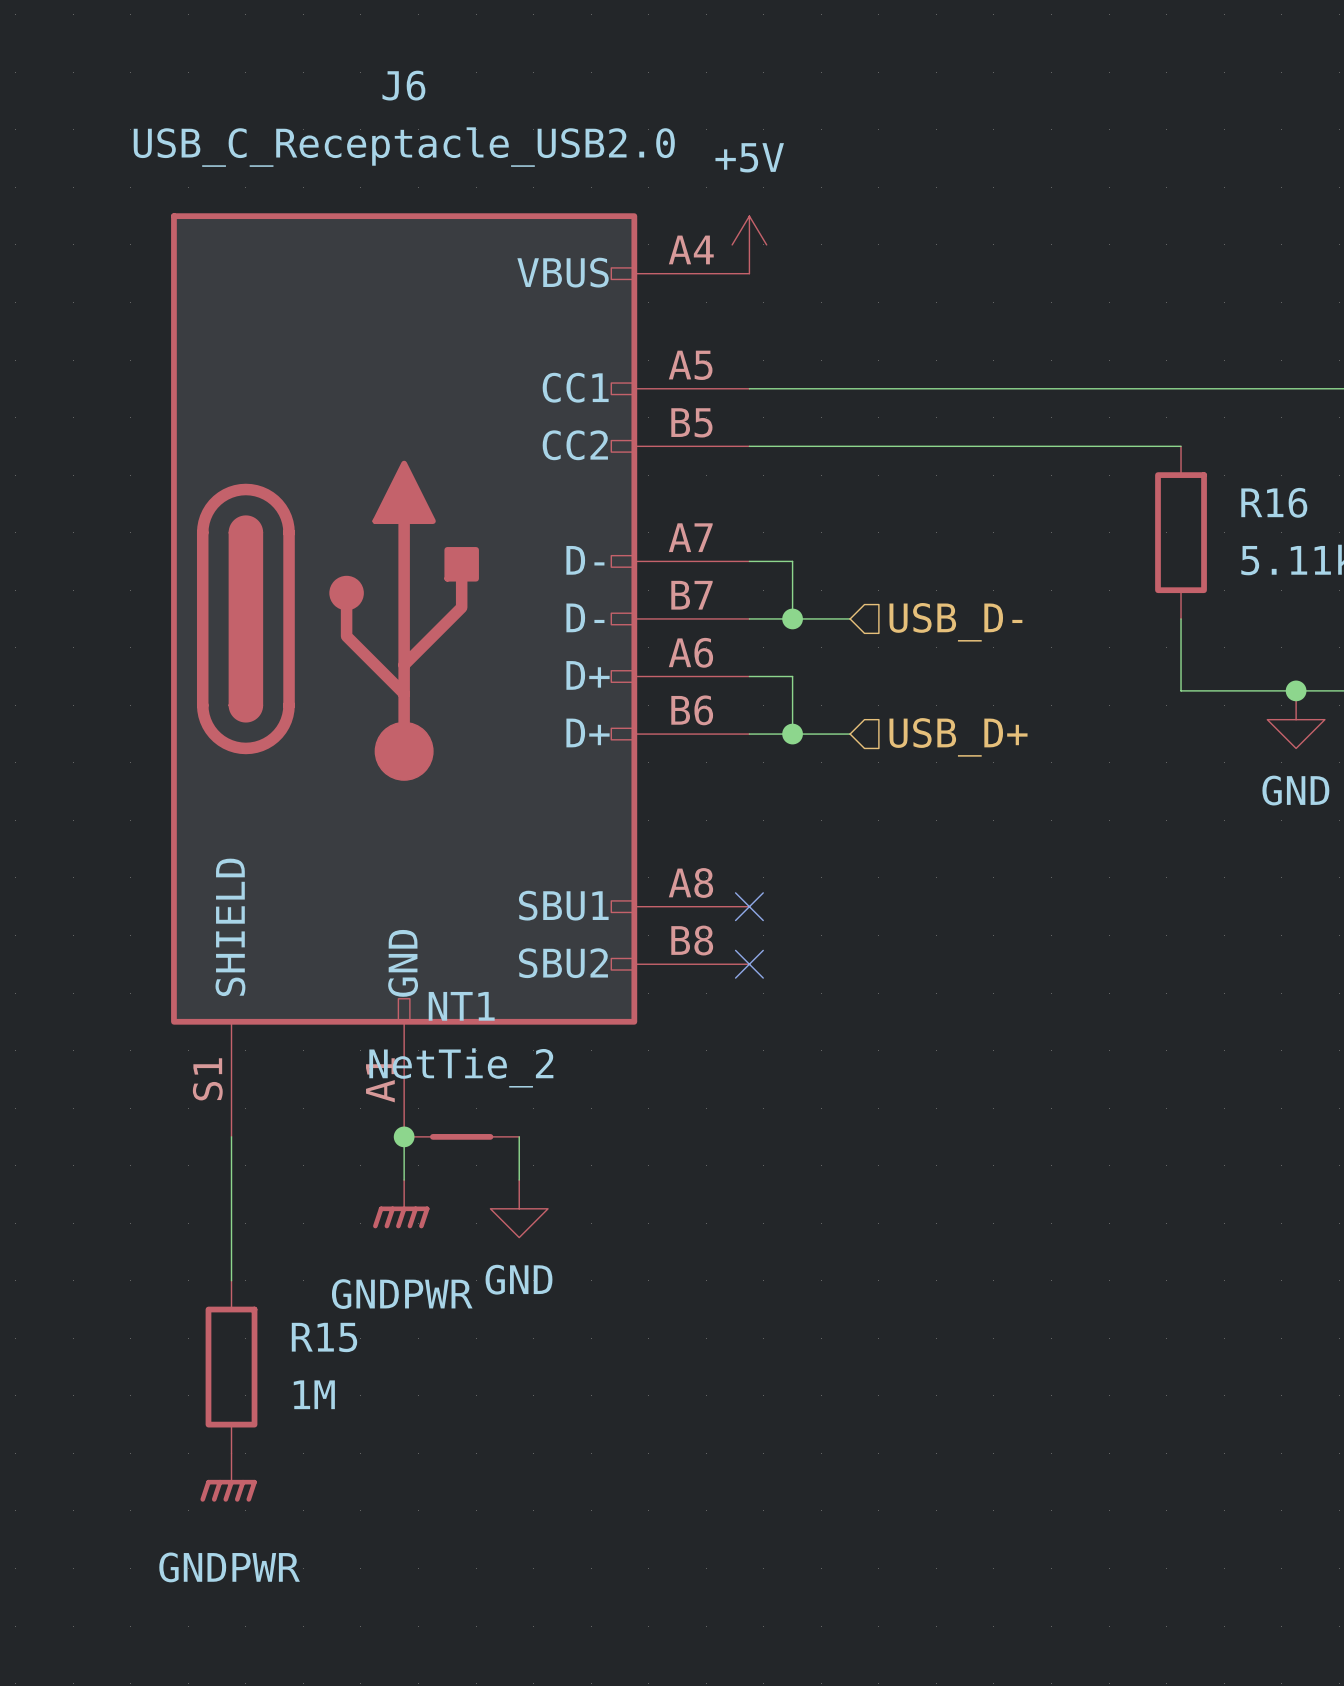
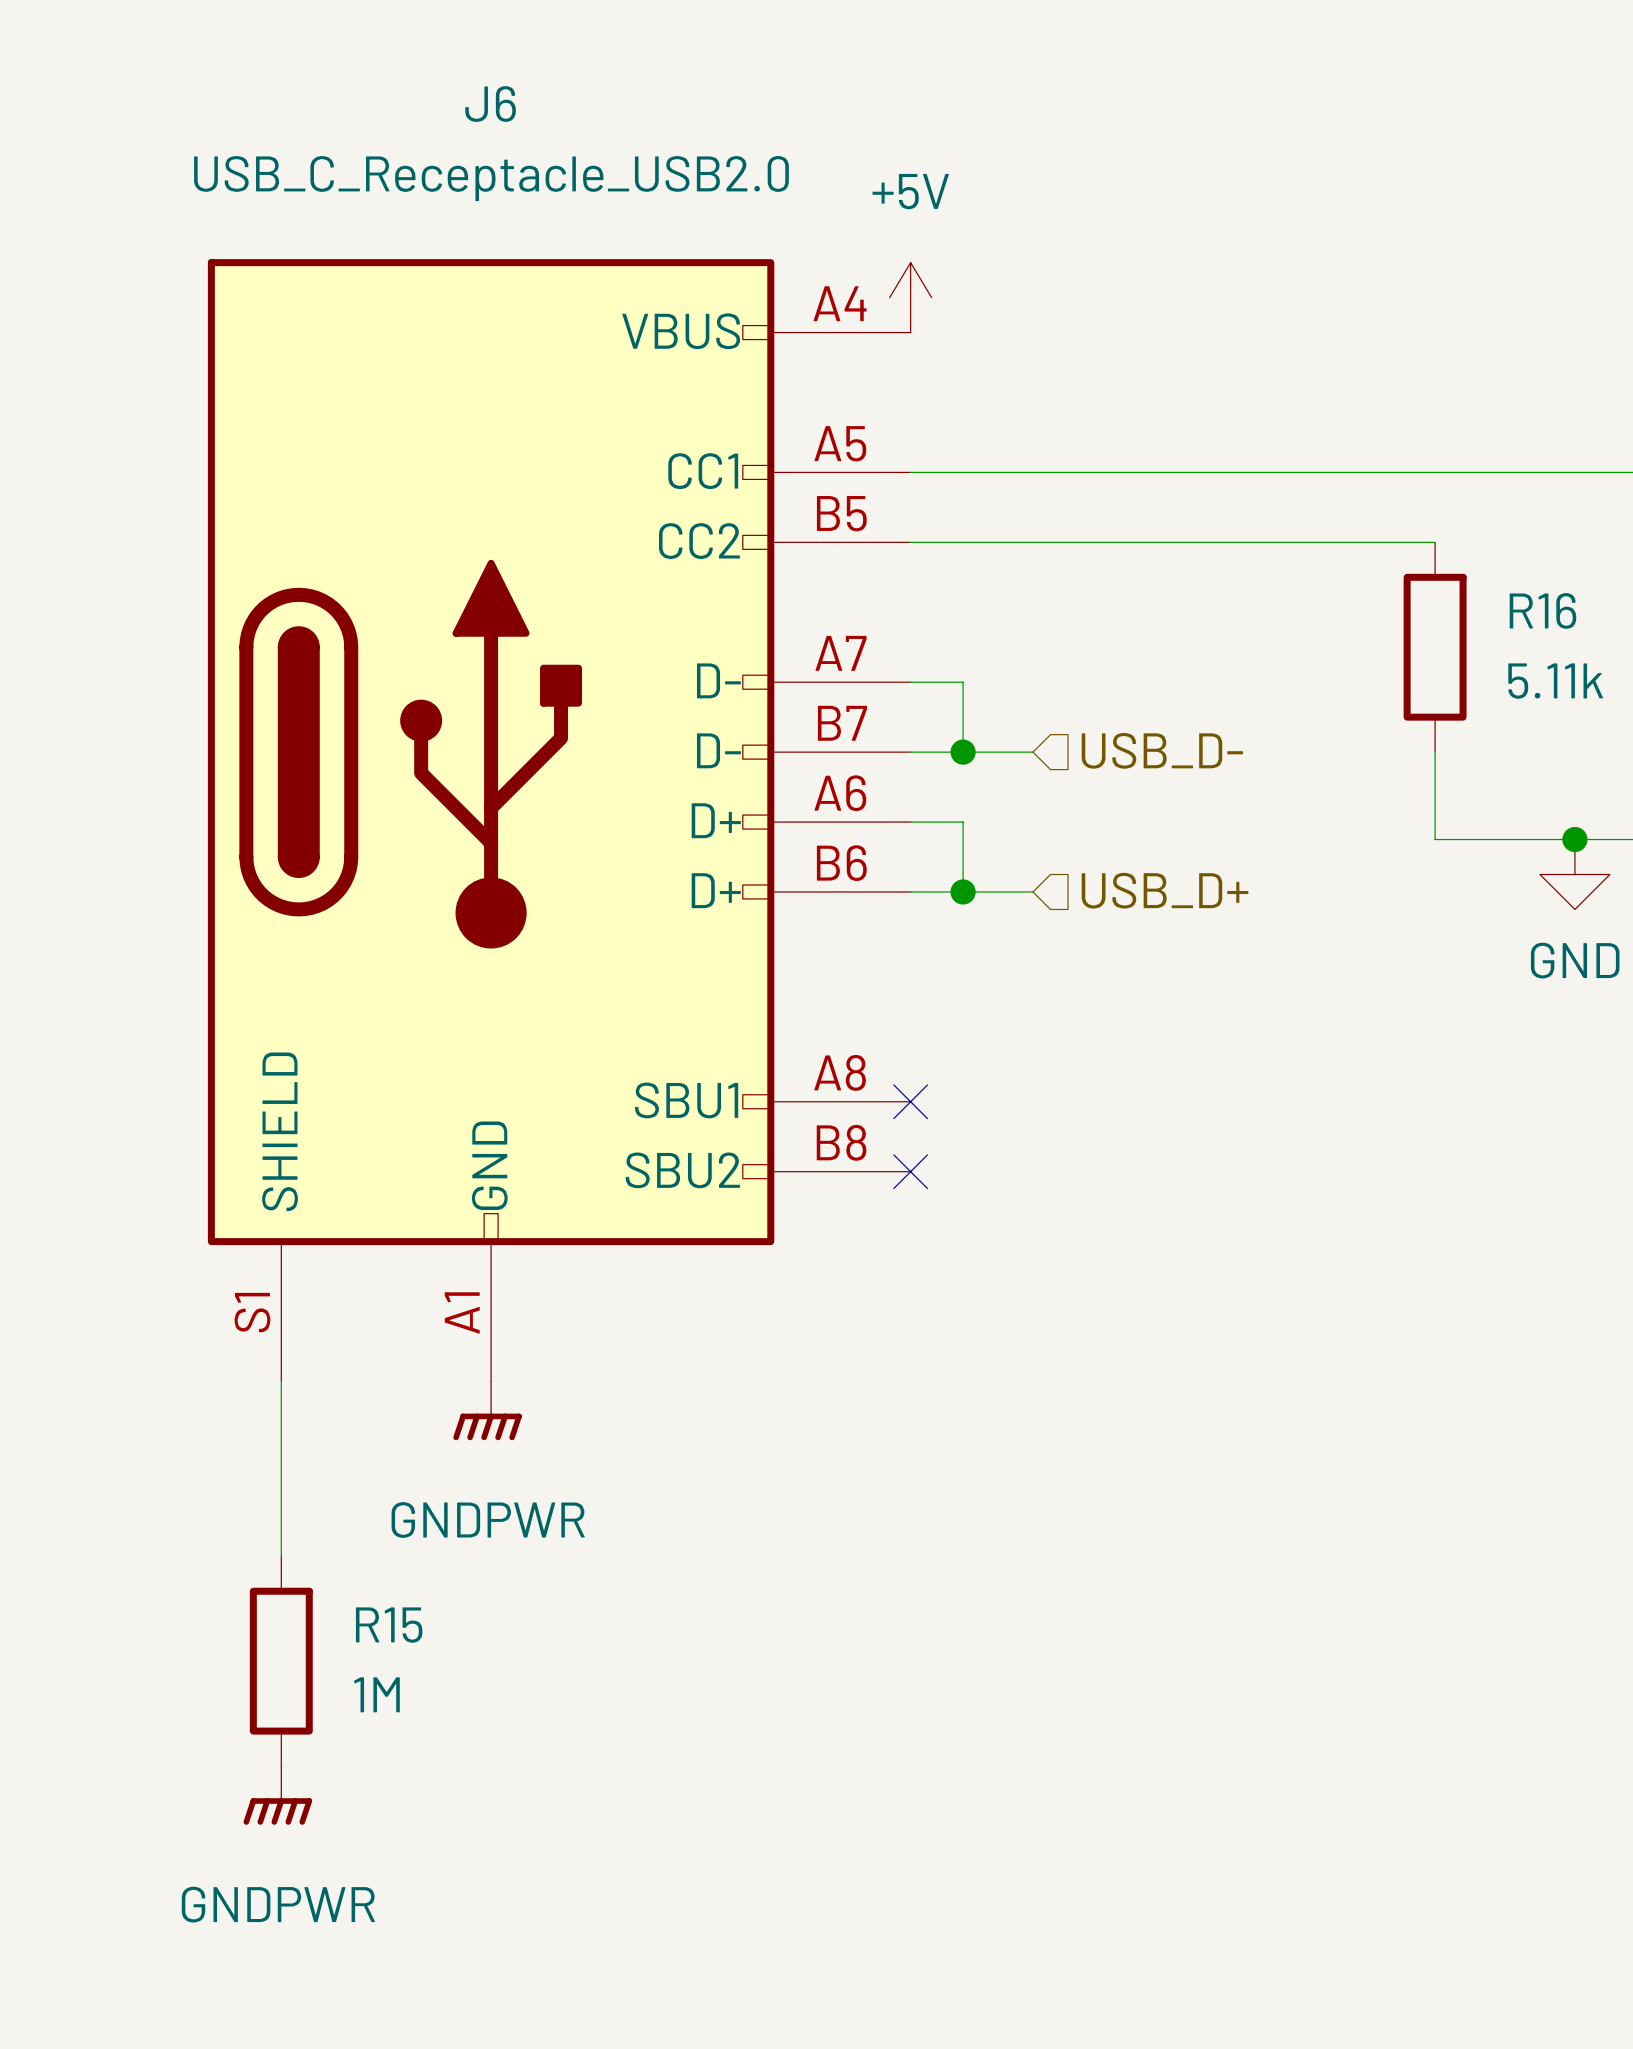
junction: (404, 1136) -> none
NT1: NetTie_2 (461, 1136) -> none
wire: (519, 1136) (519, 1180) -> none
power symbol position: GNDPWR (401, 1204) -> GNDPWR (487, 1410)
power symbol: GND (519, 1208) -> none

